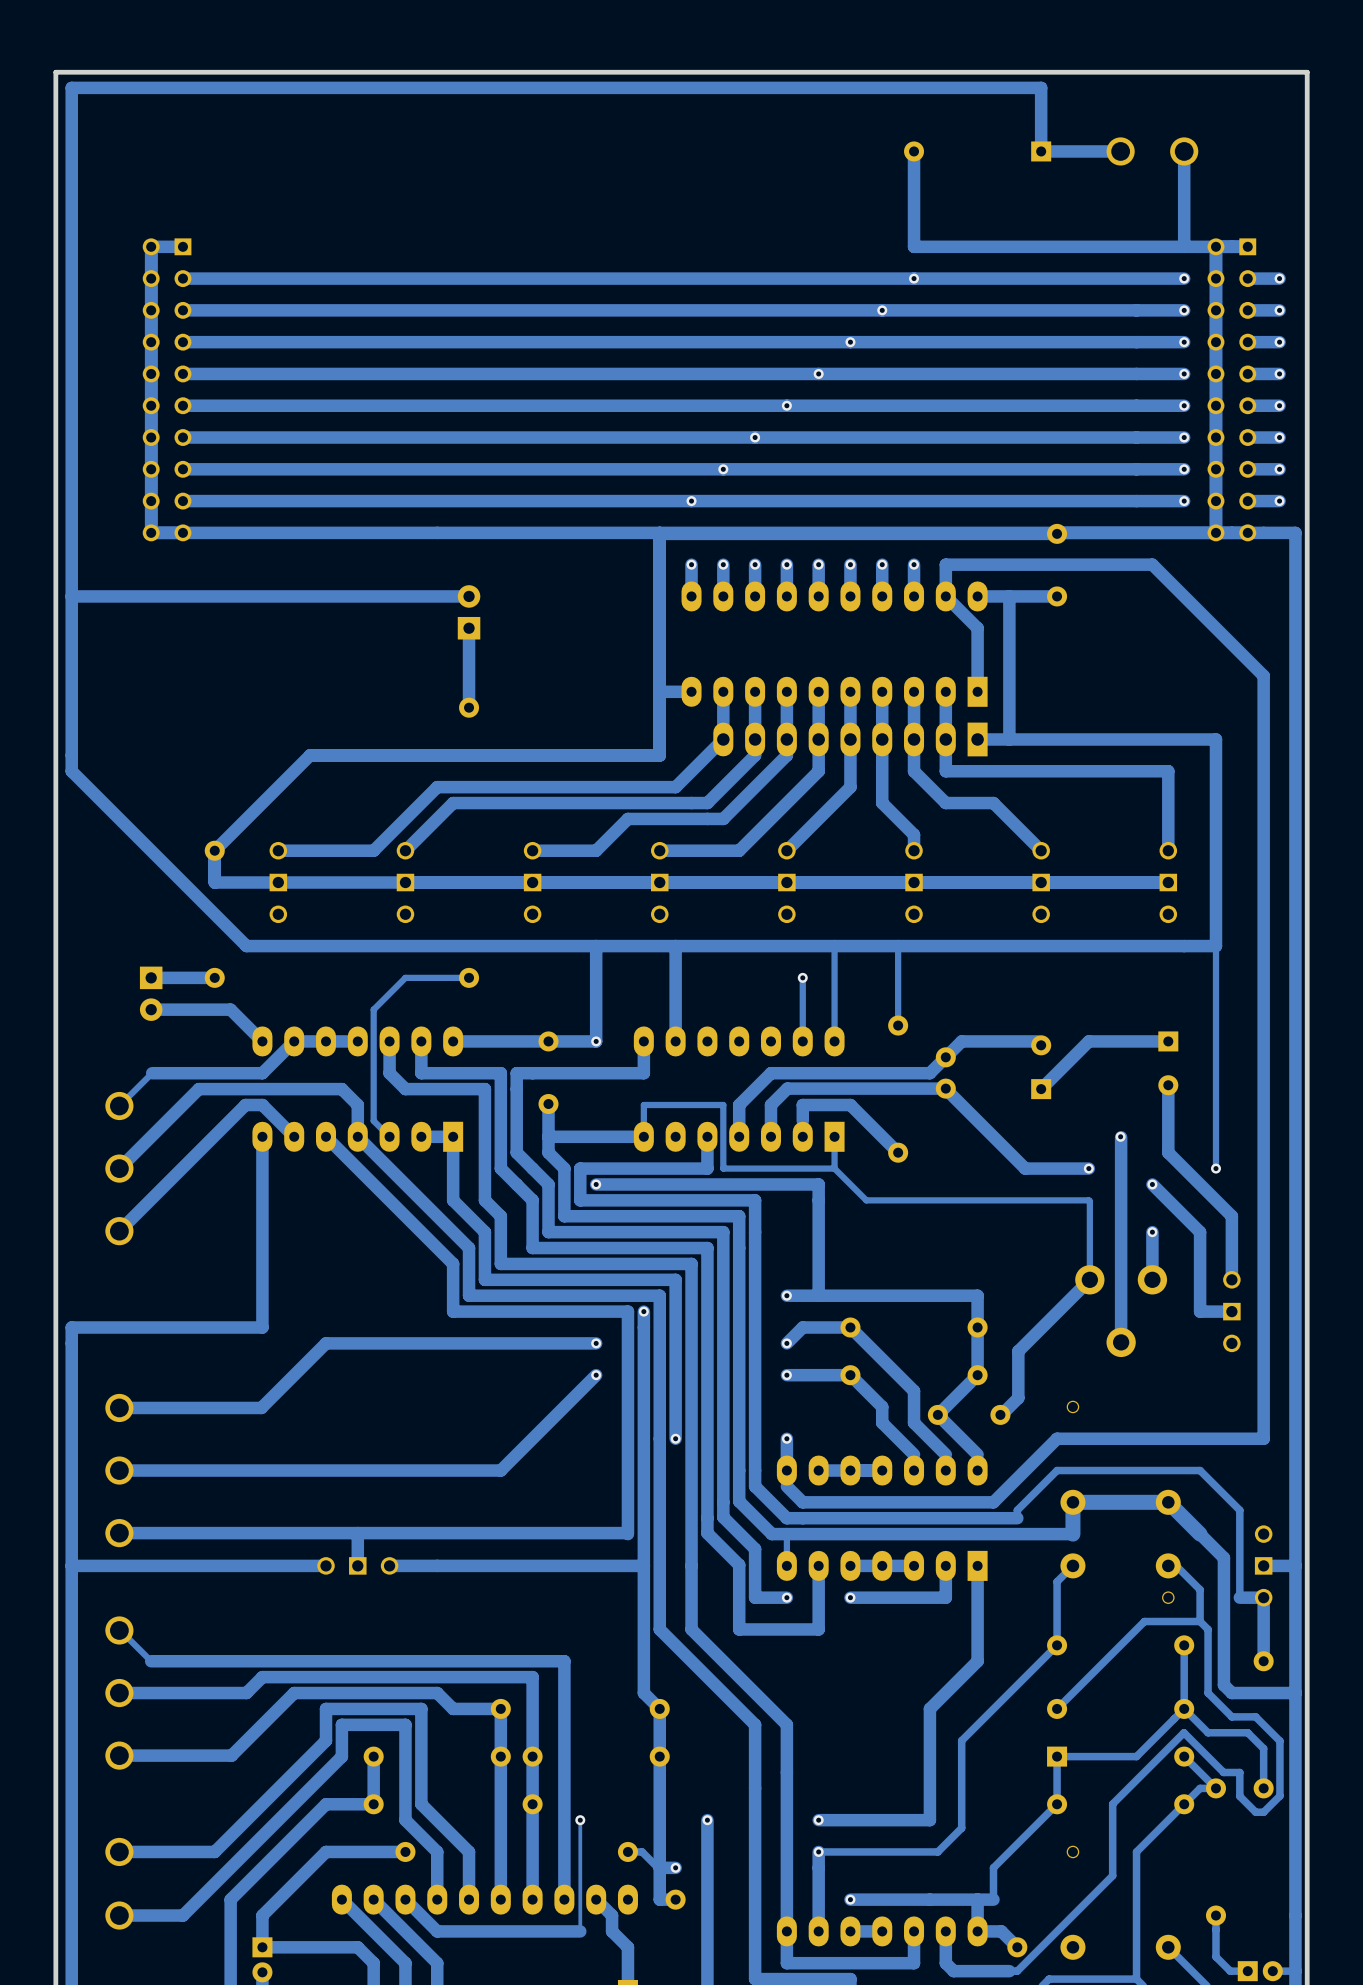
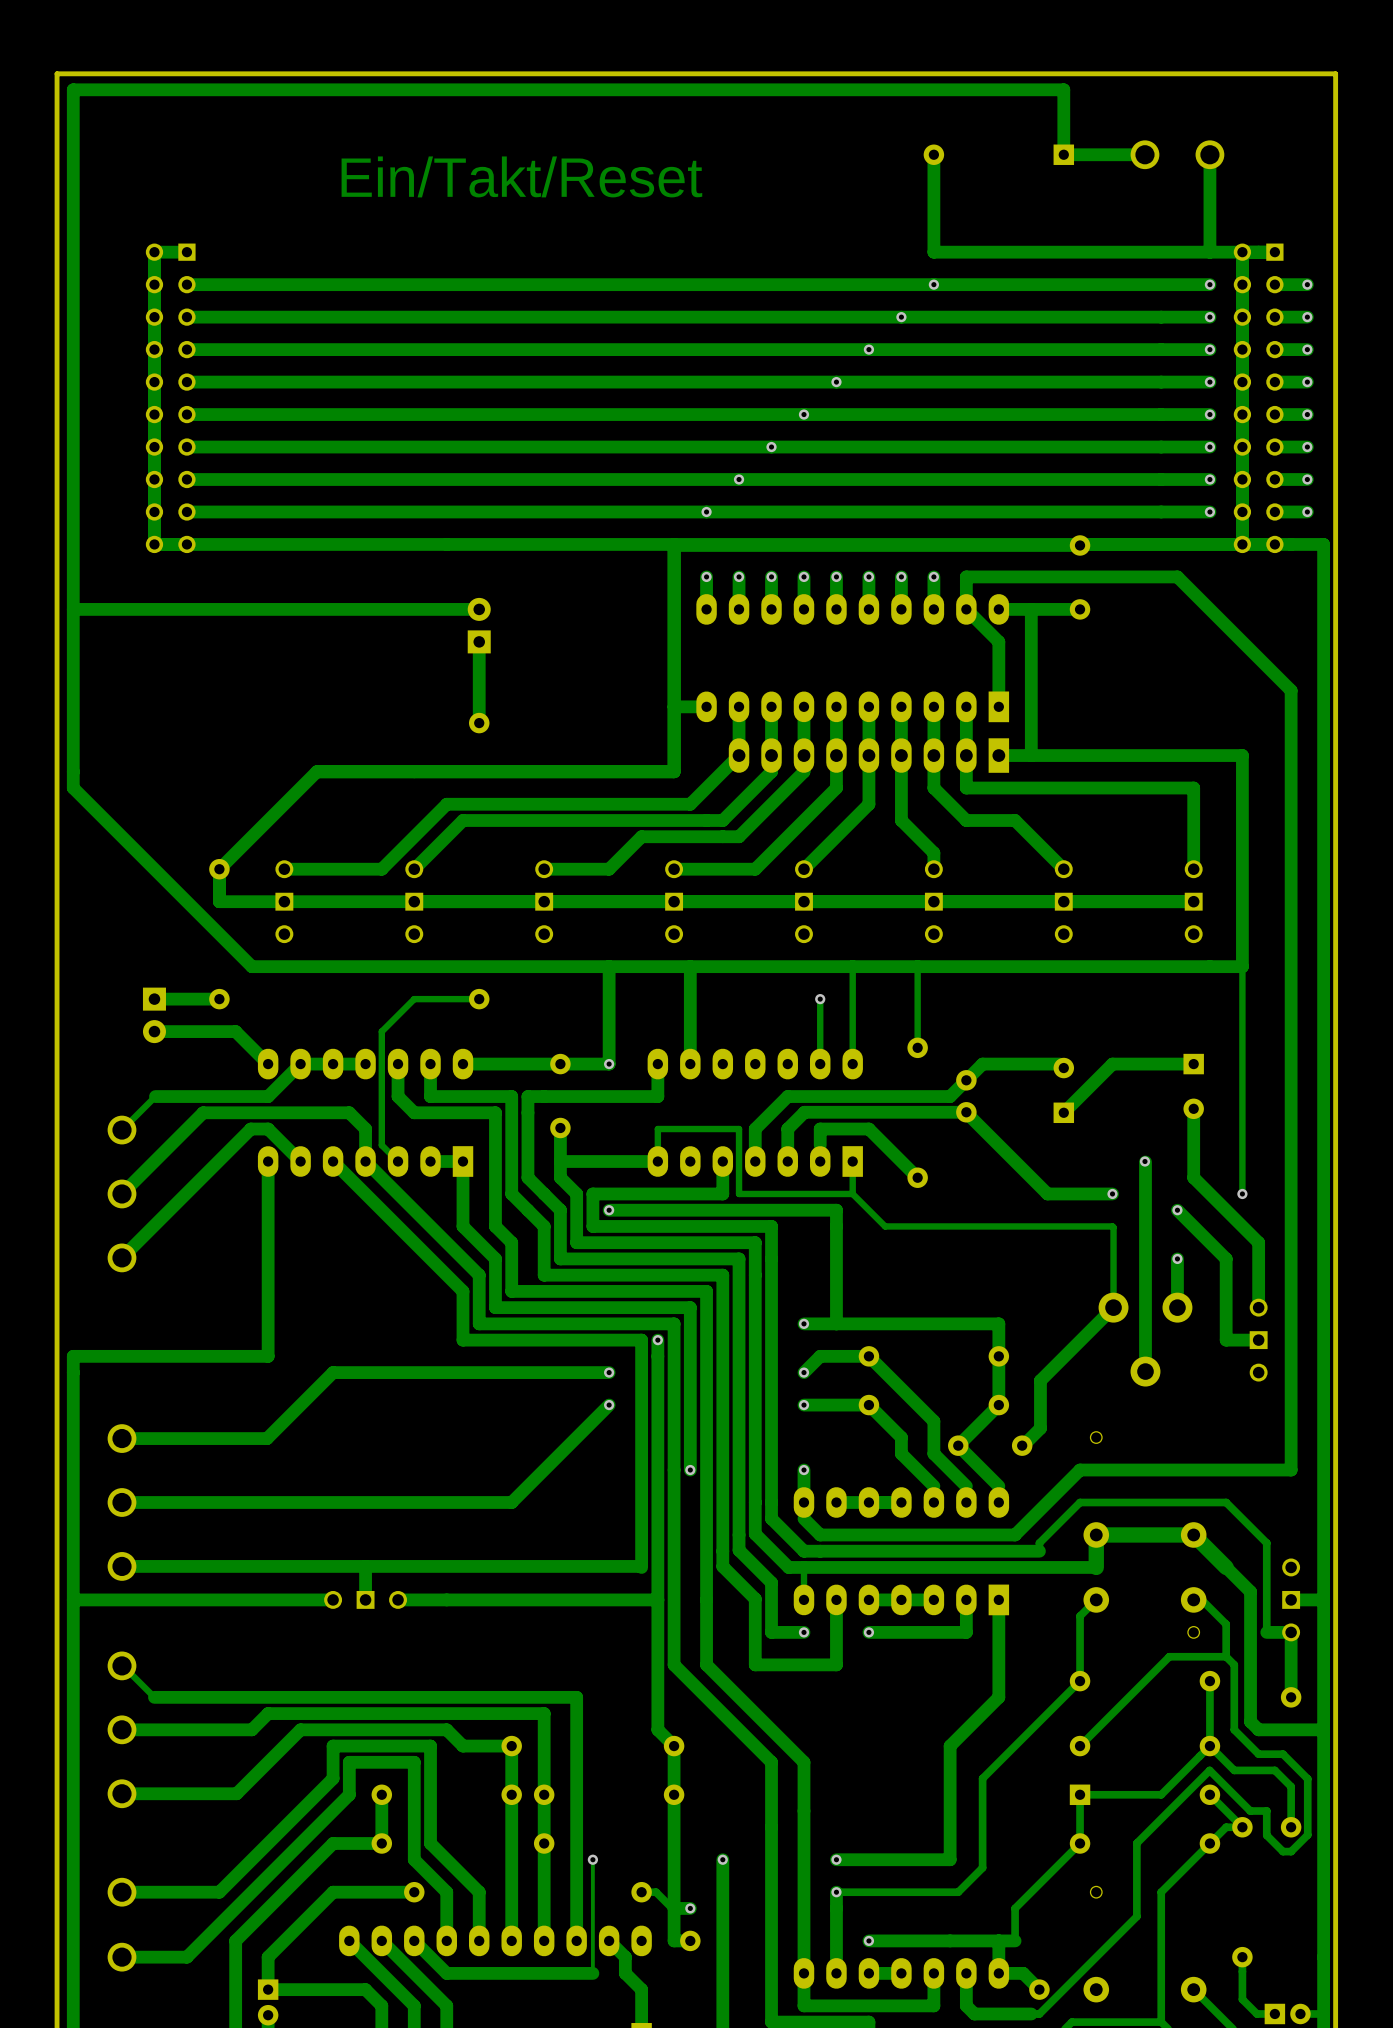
text: none -> Ein/Takt/Reset (521, 176)

